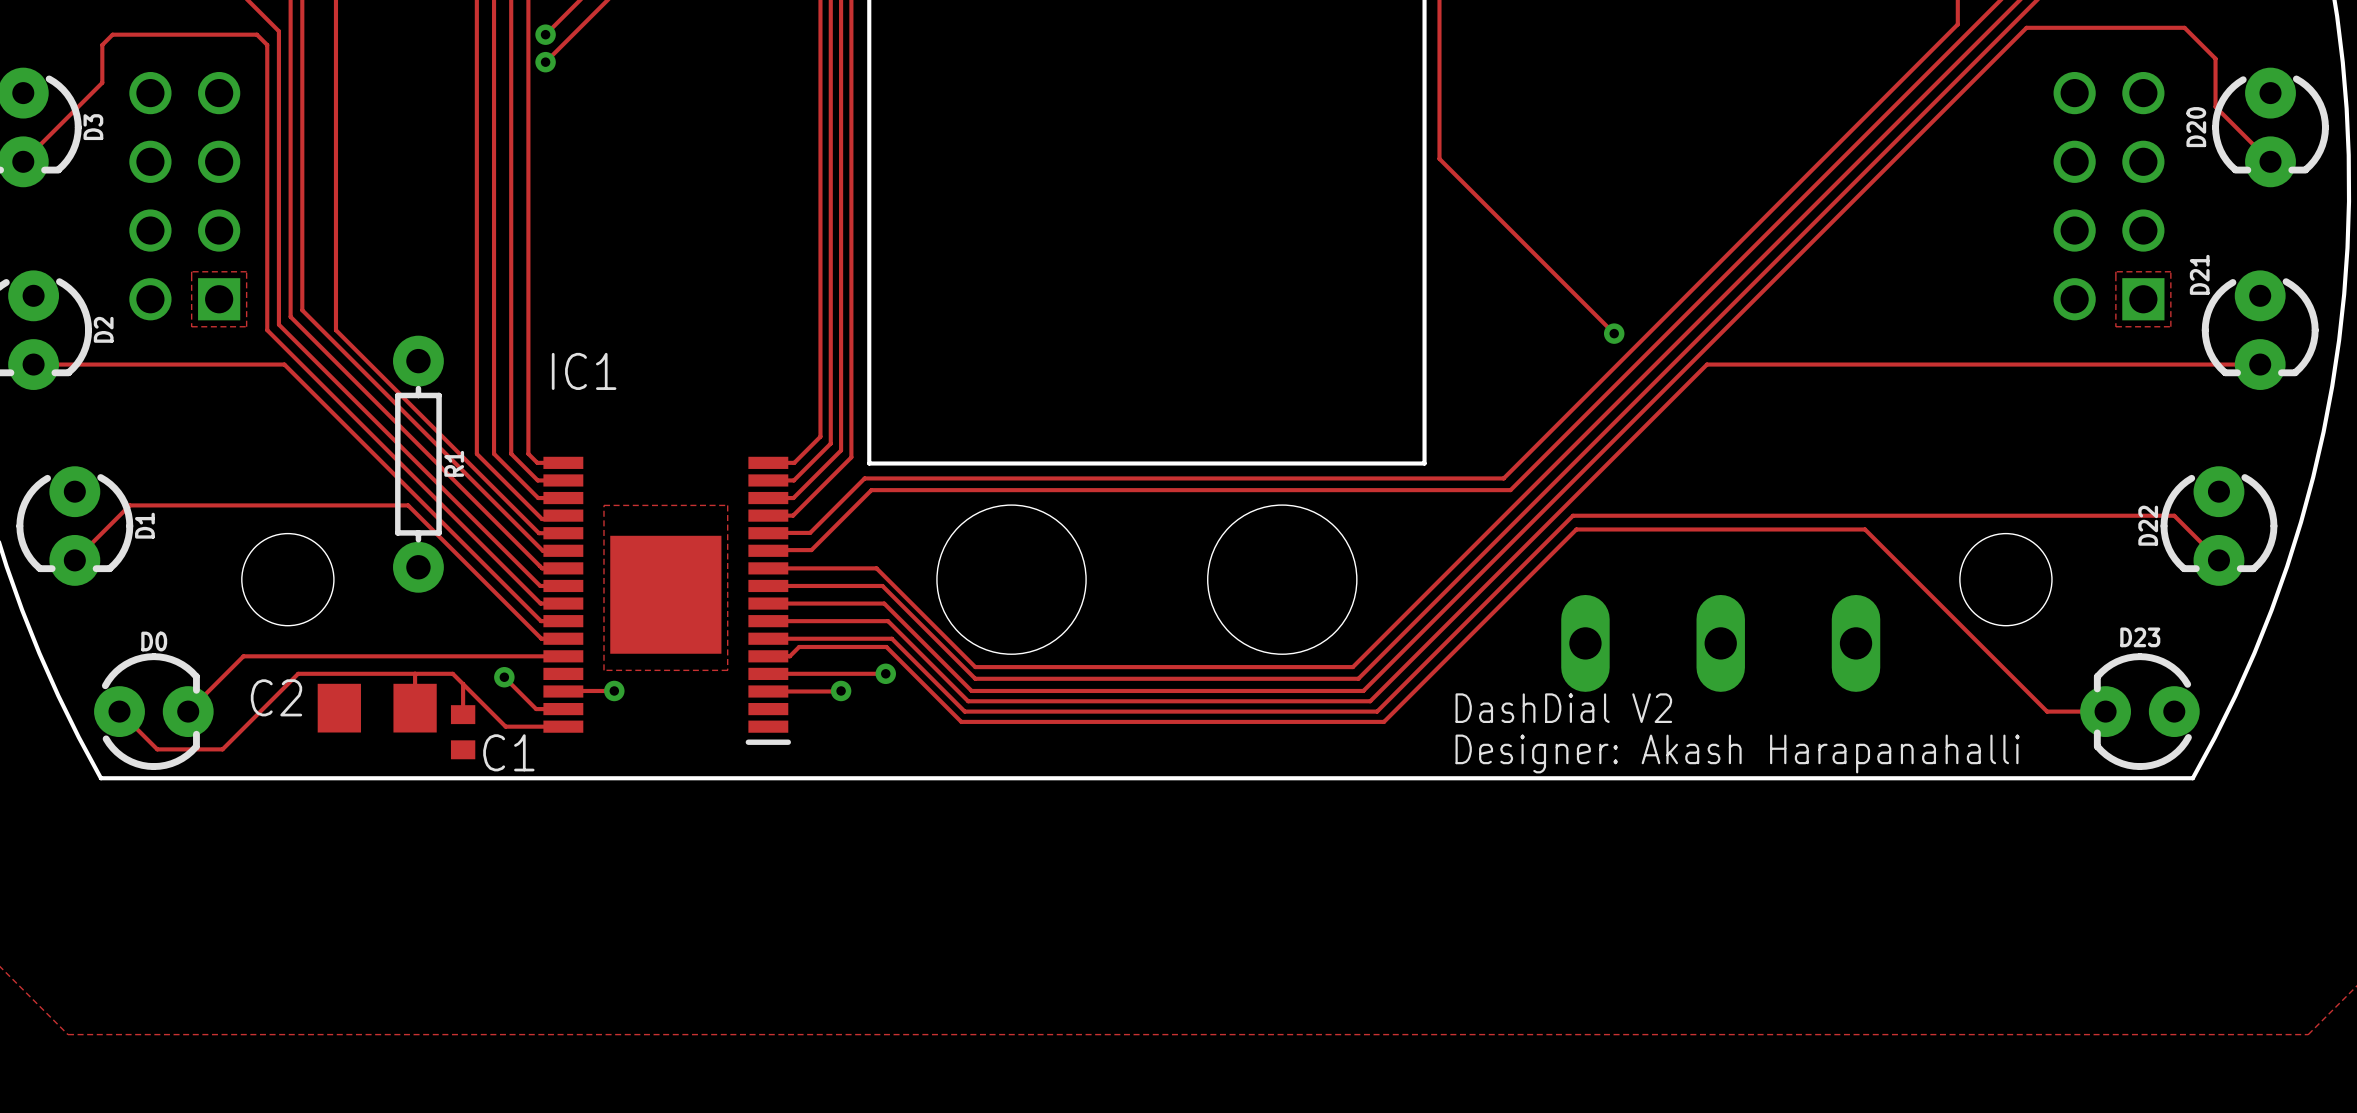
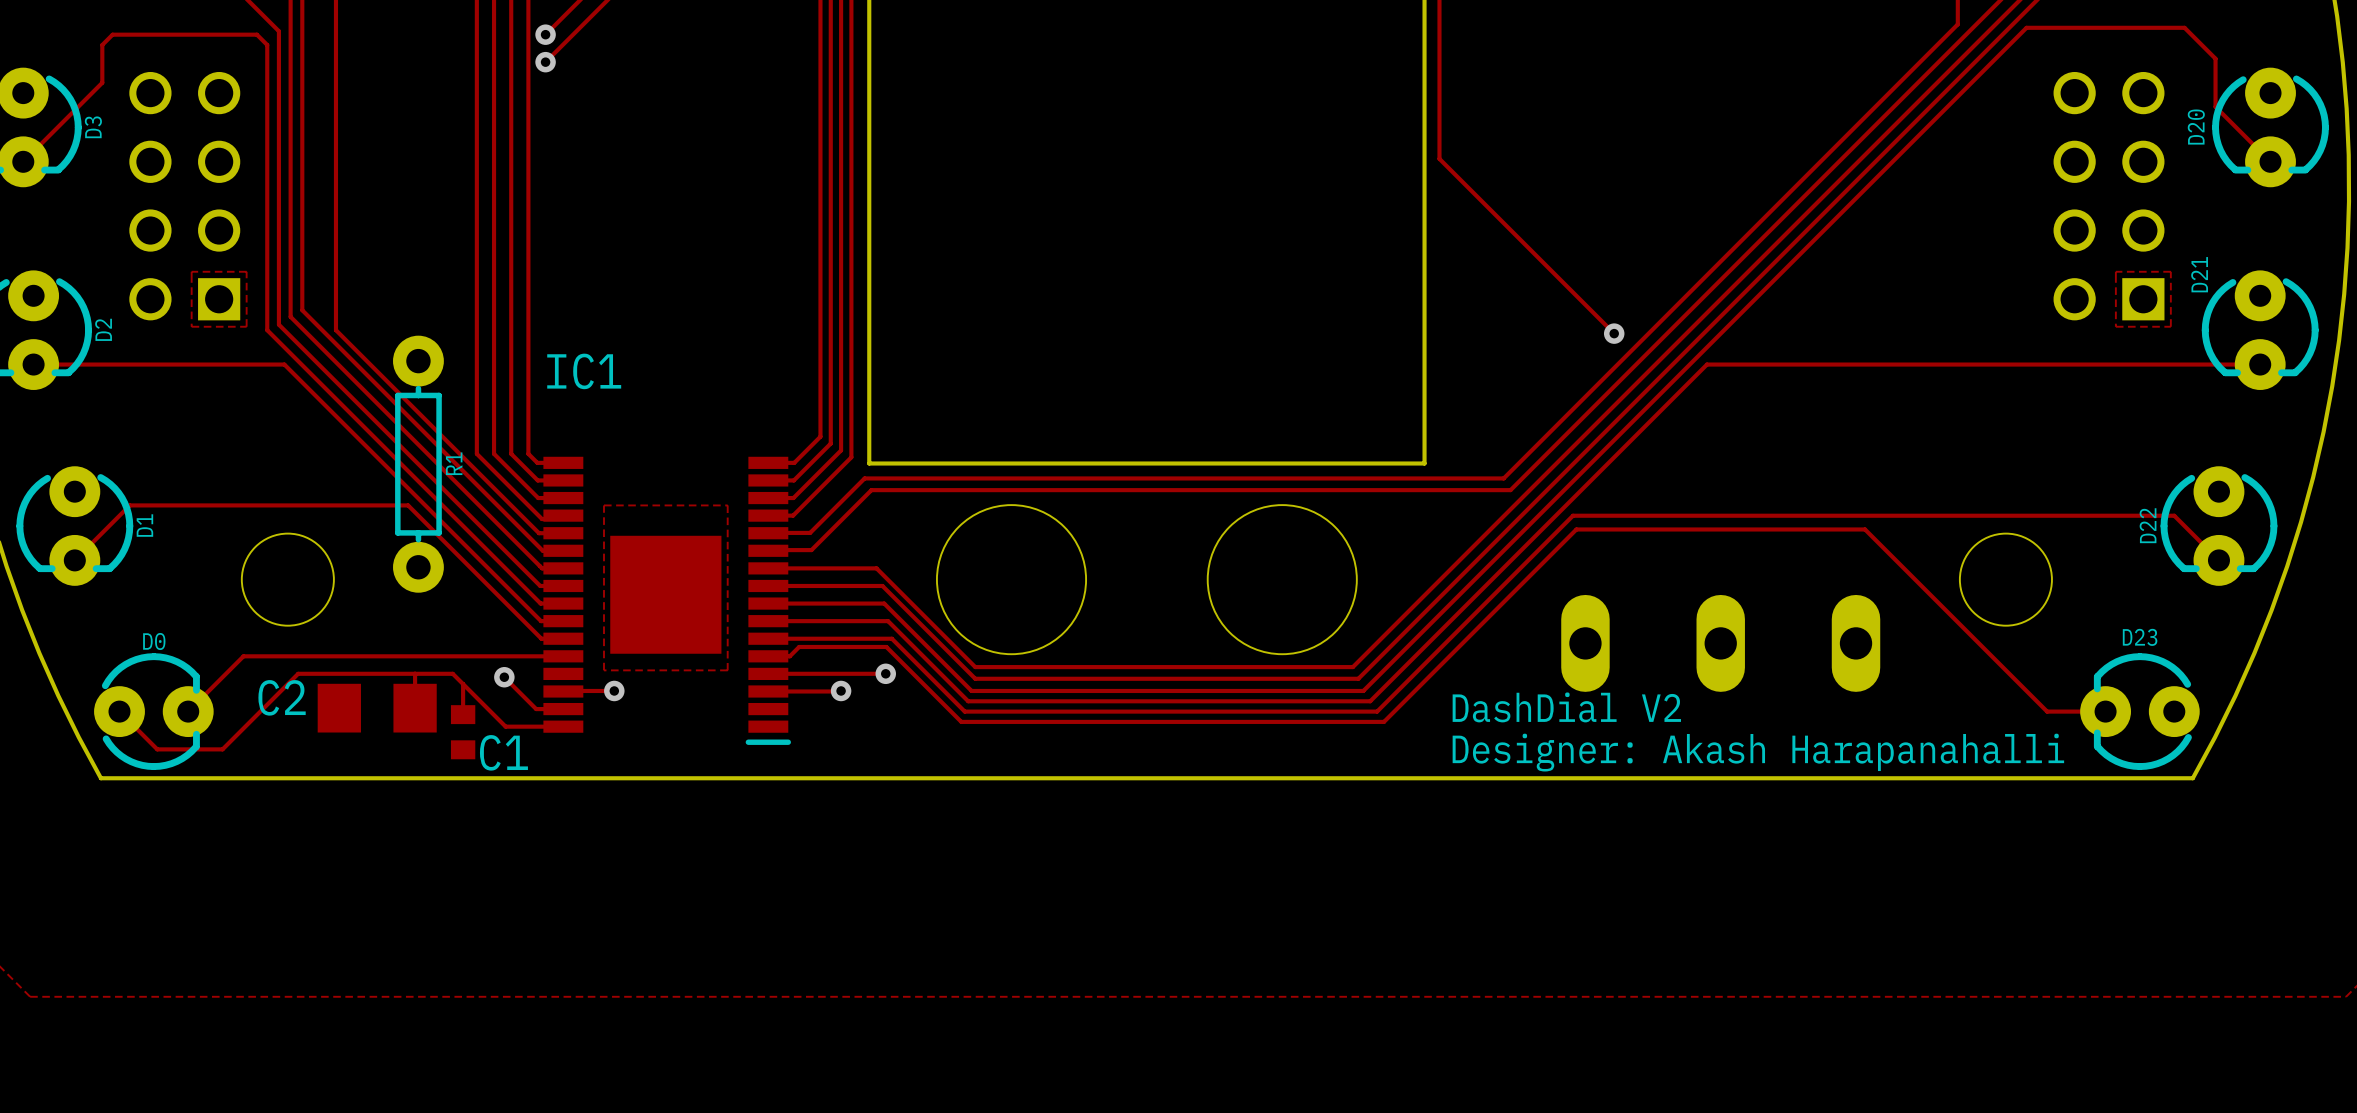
zone outline: (30, 996) (67, 1034) (2308, 1034) (2346, 996) -> (30, 996) (2346, 996)

